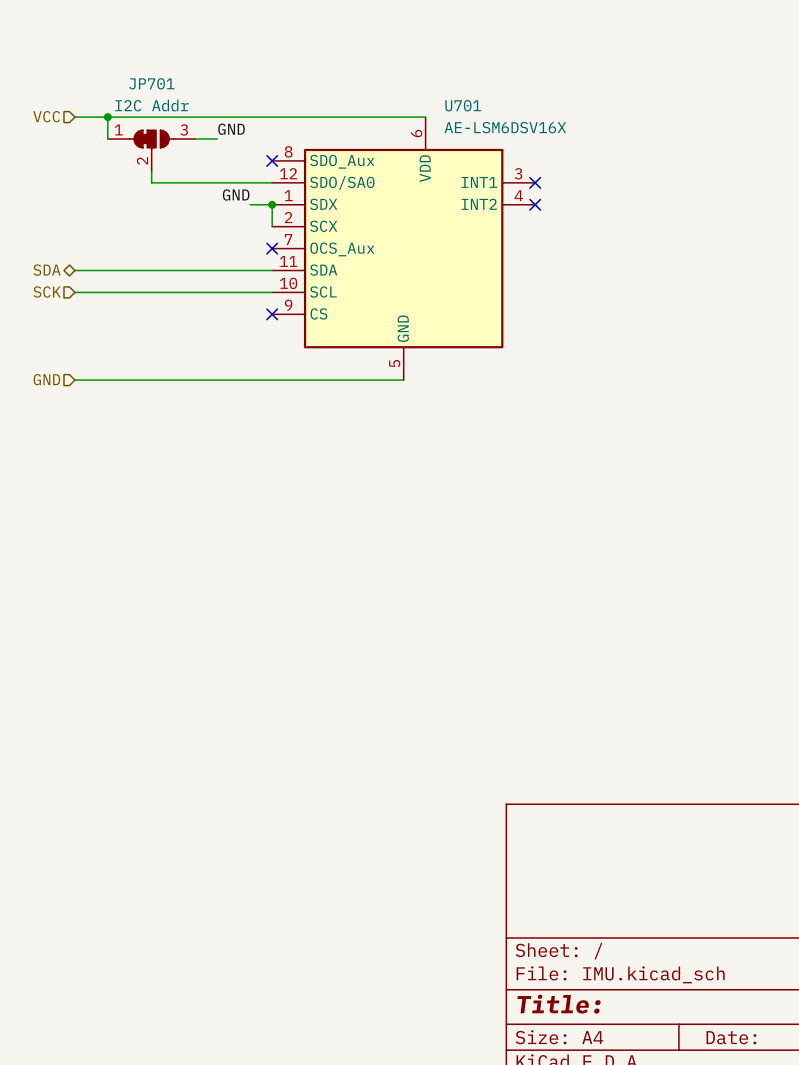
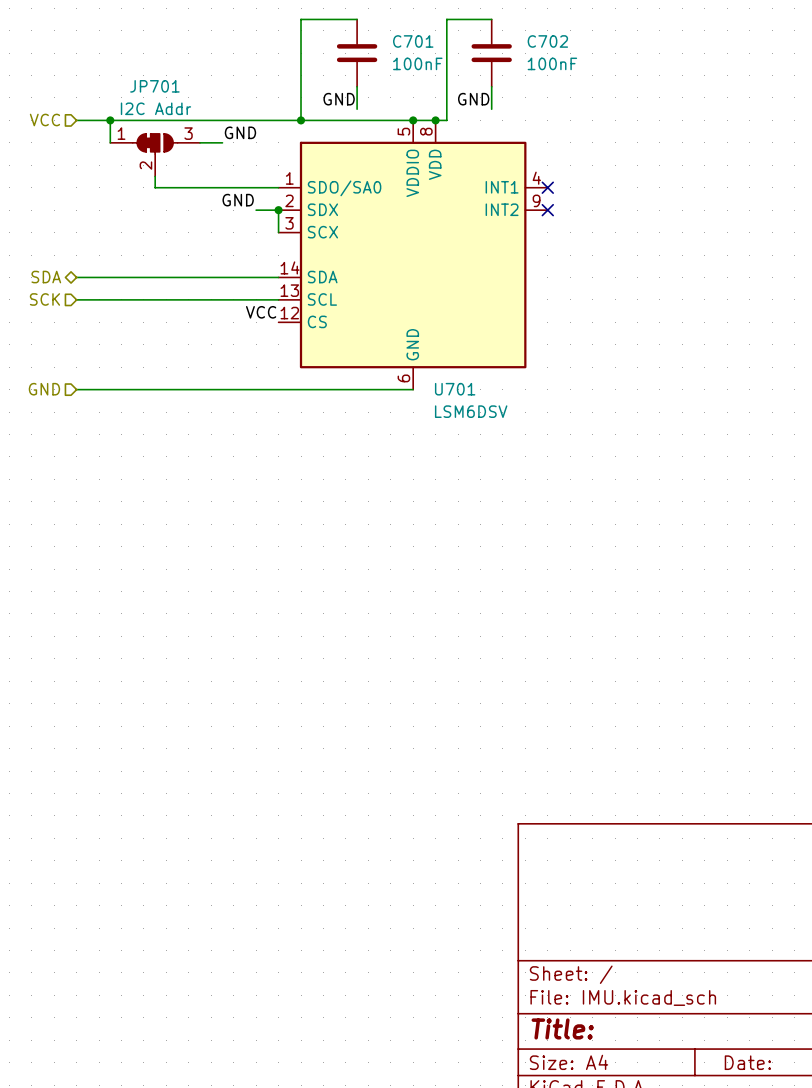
wire: none -> (357, 19) (301, 19) (301, 120)
wire: none -> (491, 19) (446, 19) (446, 120) (435, 120)
C701: none -> 100nF (357, 53)
C702: none -> 100nF (491, 53)
wire: none -> (357, 86) (357, 109)
wire: none -> (491, 86) (491, 109)
label: none -> GND (339, 99)
label: none -> GND (473, 99)
U701 name position: U701 (463, 105) -> U701 (455, 389)
U701 symbol: [272, 117, 536, 381] -> [278, 120, 548, 390]
junction: none -> (301, 120)
junction: none -> (413, 120)
junction: none -> (435, 120)
U701 value: AE-LSM6DSV16X (505, 127) -> LSM6DSV (471, 411)
no-connect mark: (272, 160) -> none
no-connect mark: (272, 248) -> none
label: none -> VCC (261, 312)
no-connect mark: (272, 314) -> none

